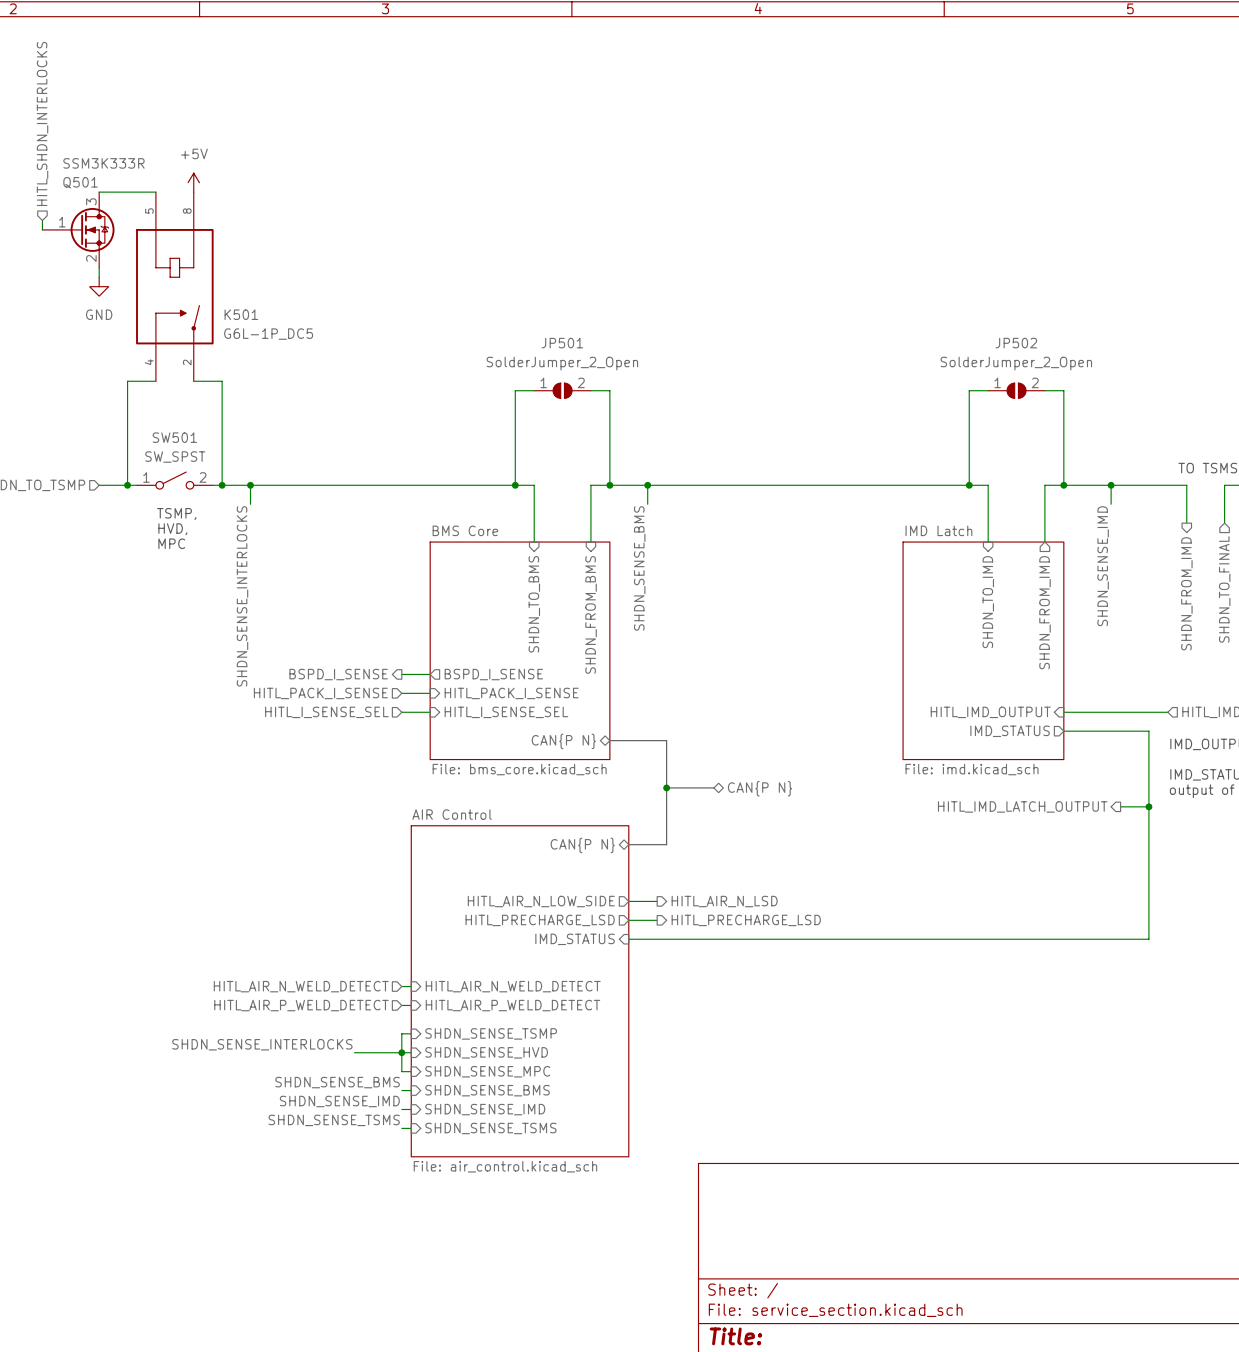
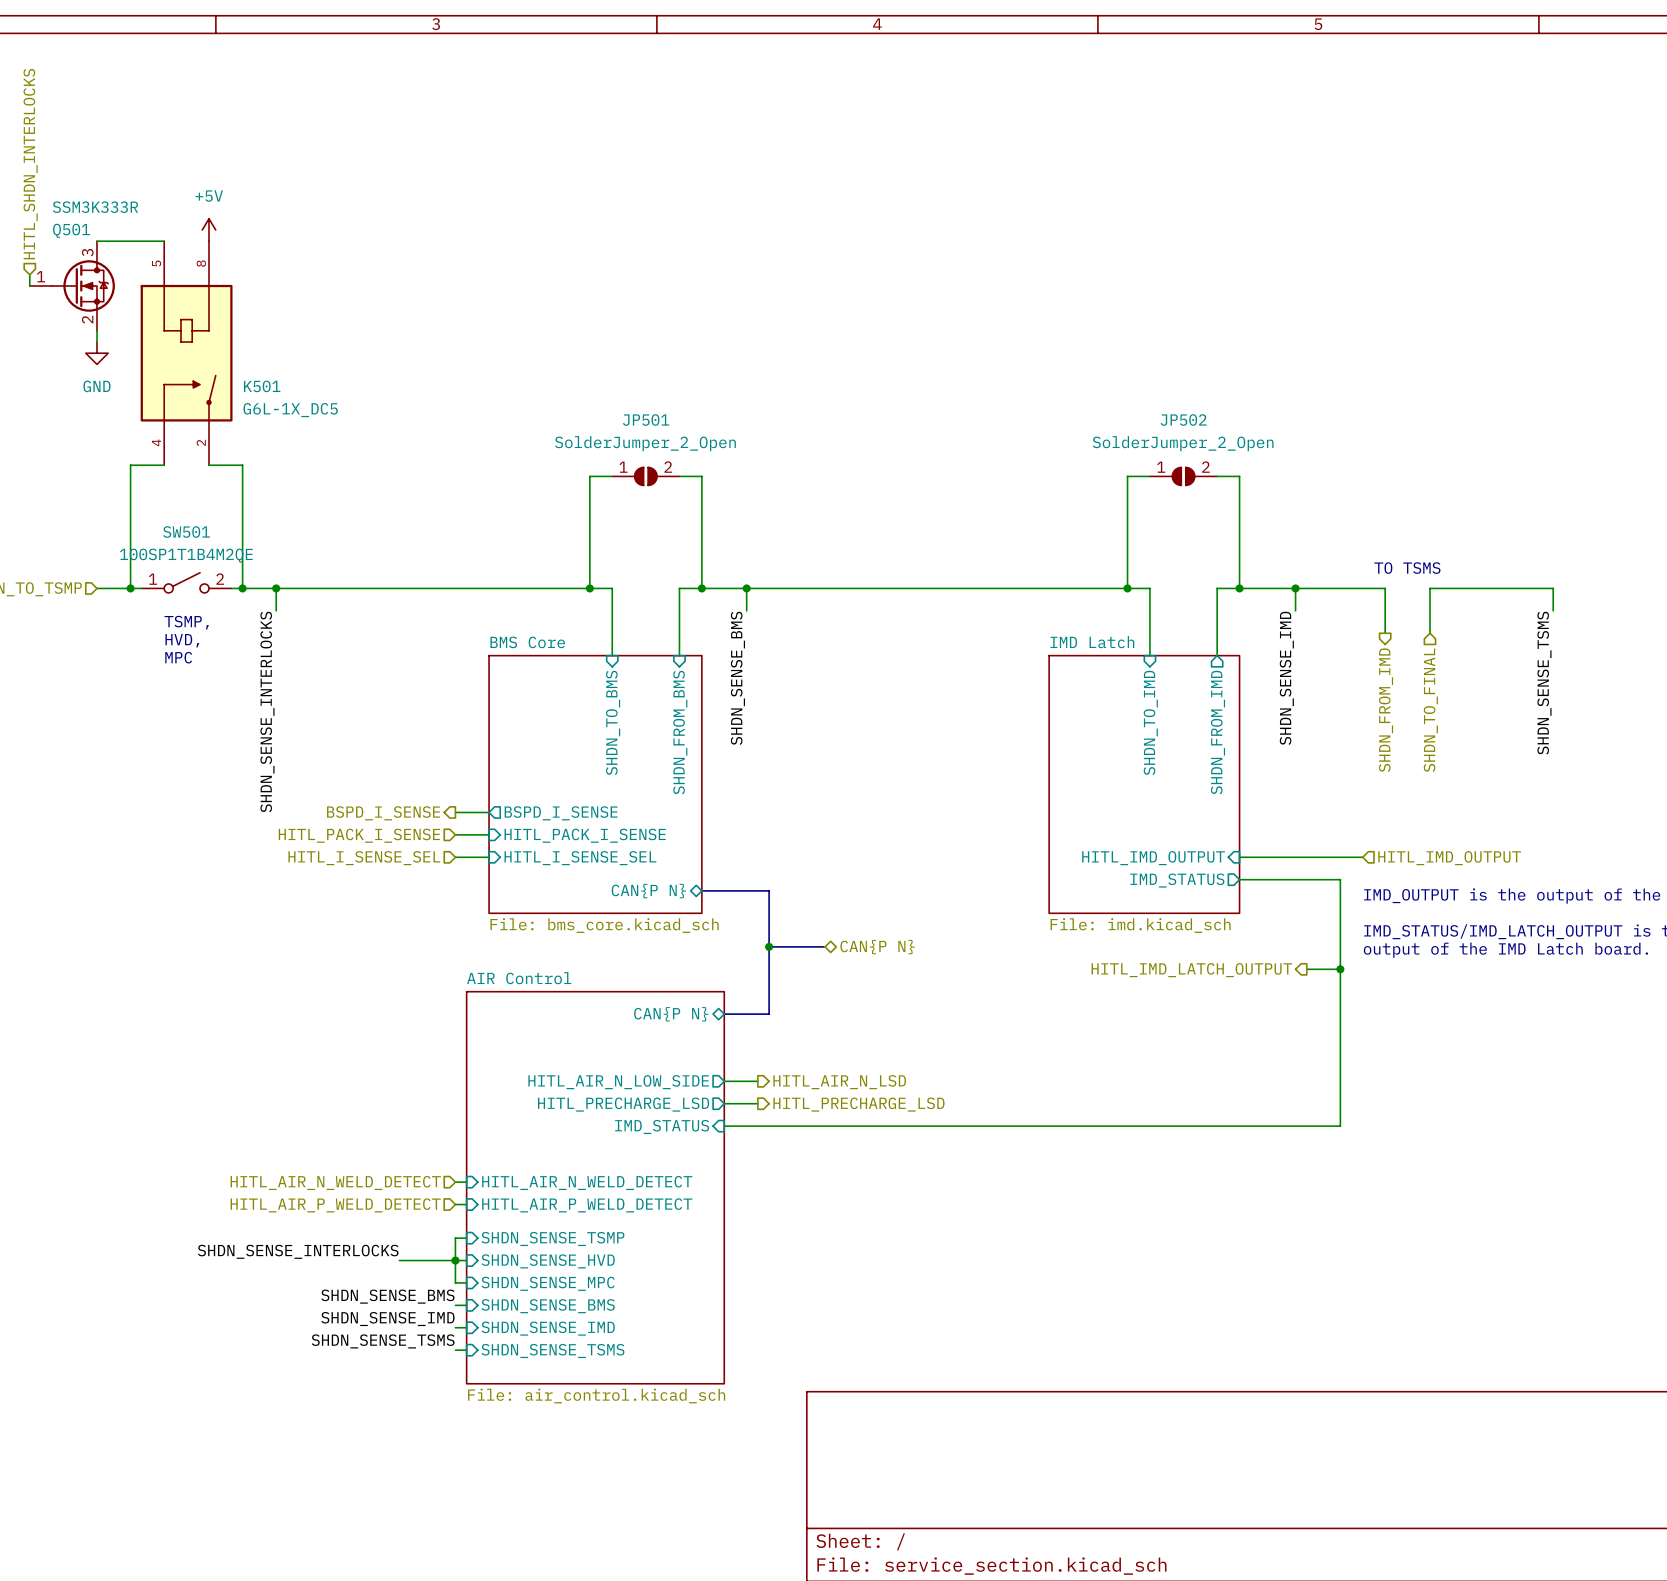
Q501 symbol: [42, 192, 115, 268] -> [29, 241, 115, 331]
K501 value: G6L-1P_DC5 (268, 334) -> G6L-1X_DC5 (290, 410)
SW501 value: SW_SPST (175, 457) -> 100SP1T1B4M2QE (186, 555)

